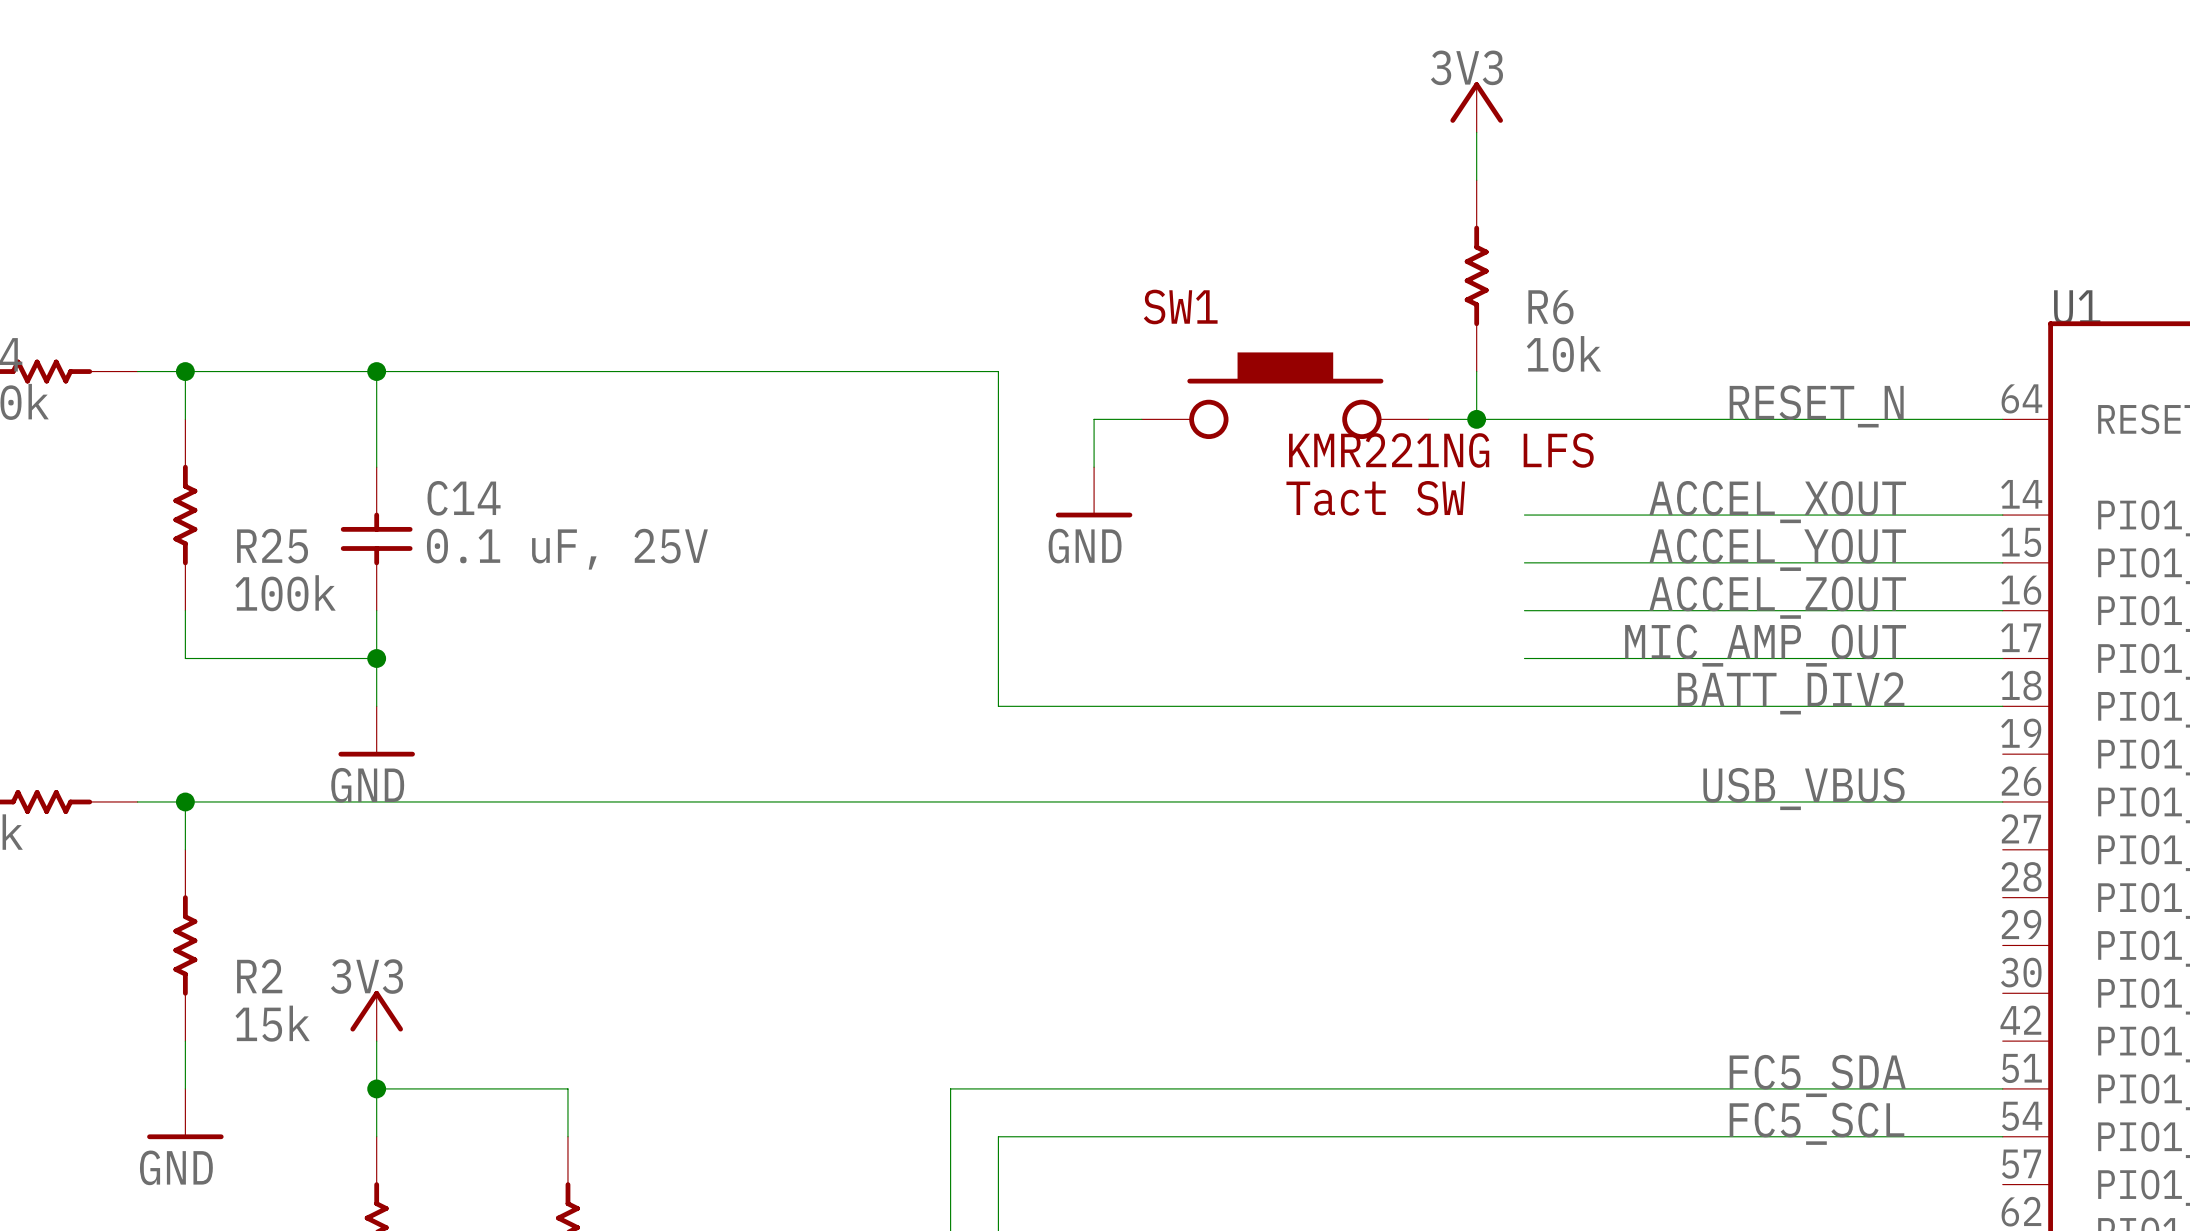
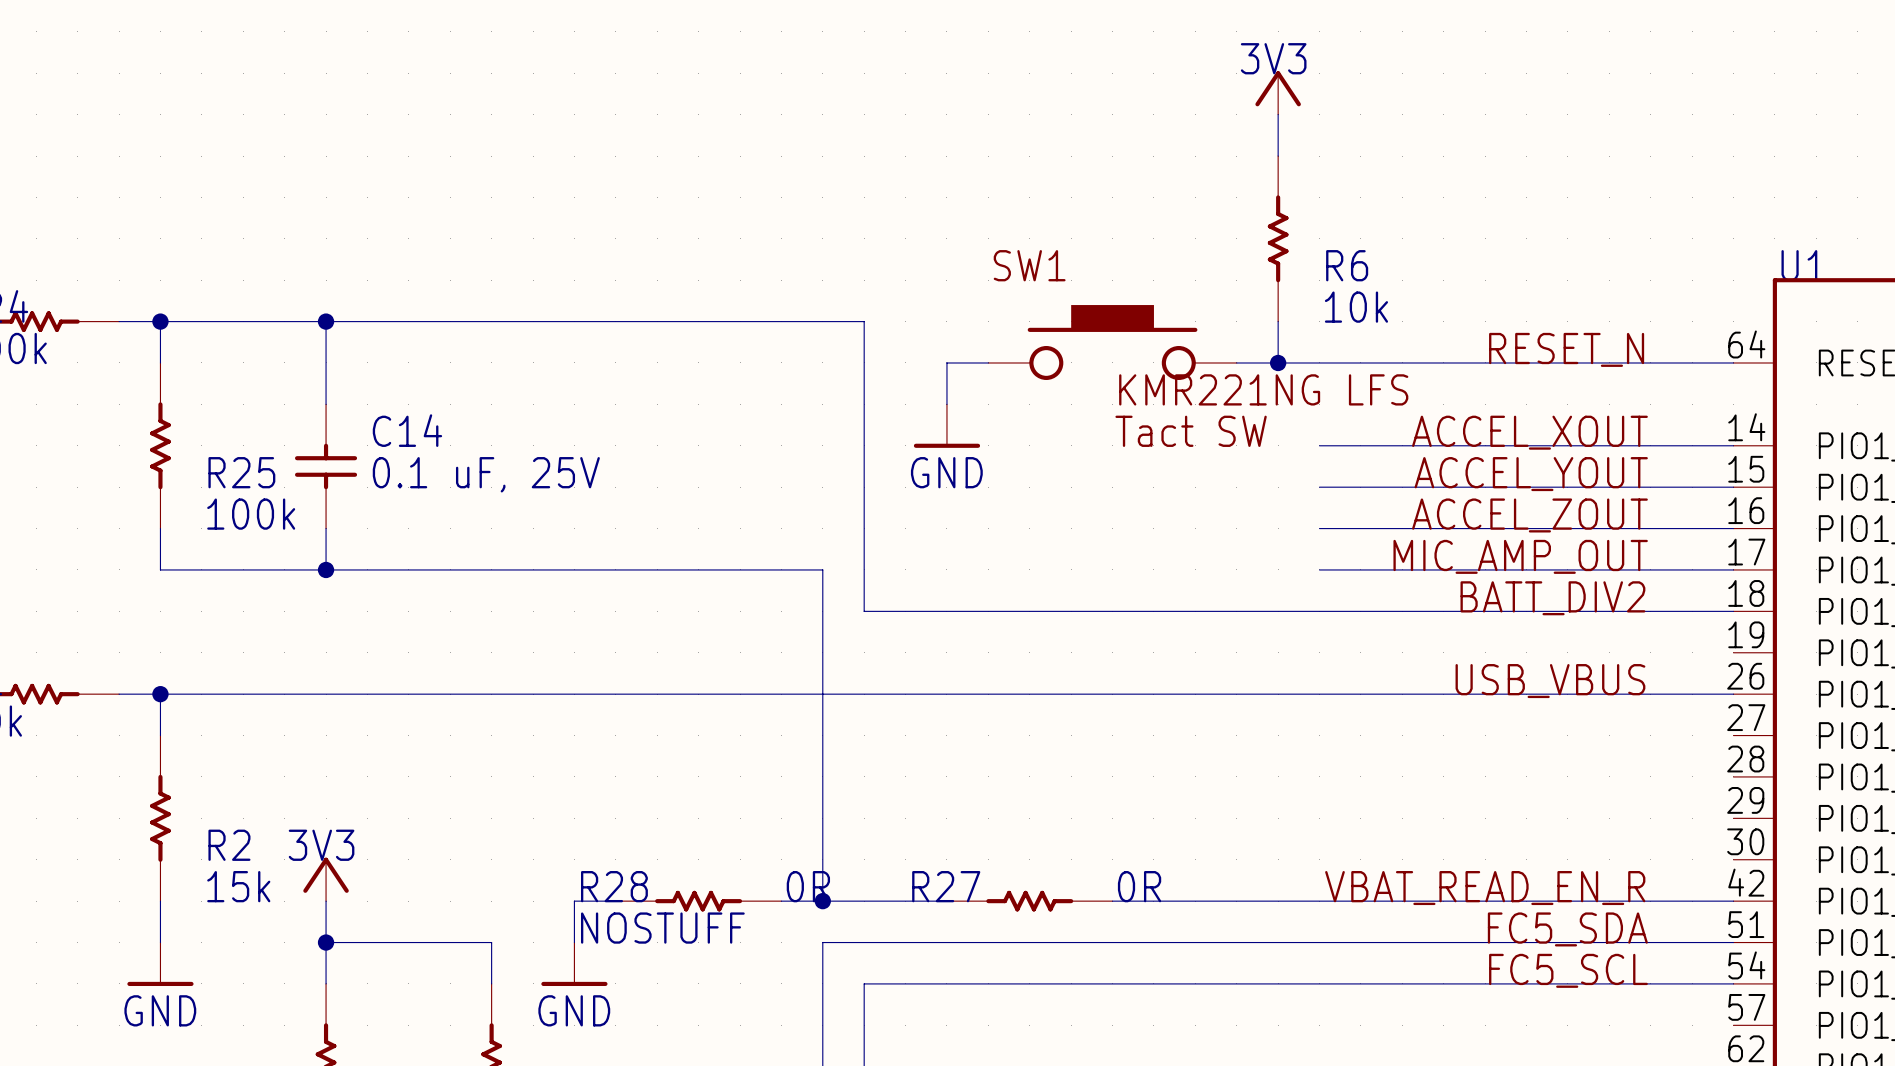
wire: (376, 658) (376, 706) -> (326, 569) (822, 569) (822, 901)
power symbol: GND (376, 731) -> none
label: none -> VBAT_READ_EN_R (1485, 888)
wire: none -> (615, 901) (574, 901) (574, 942)
R28: none -> (698, 901)
wire: none -> (781, 901) (946, 901)
junction: none -> (822, 901)
R27: none -> (1029, 901)
wire: none -> (1112, 901) (1733, 901)
power symbol: none -> GND (574, 964)

